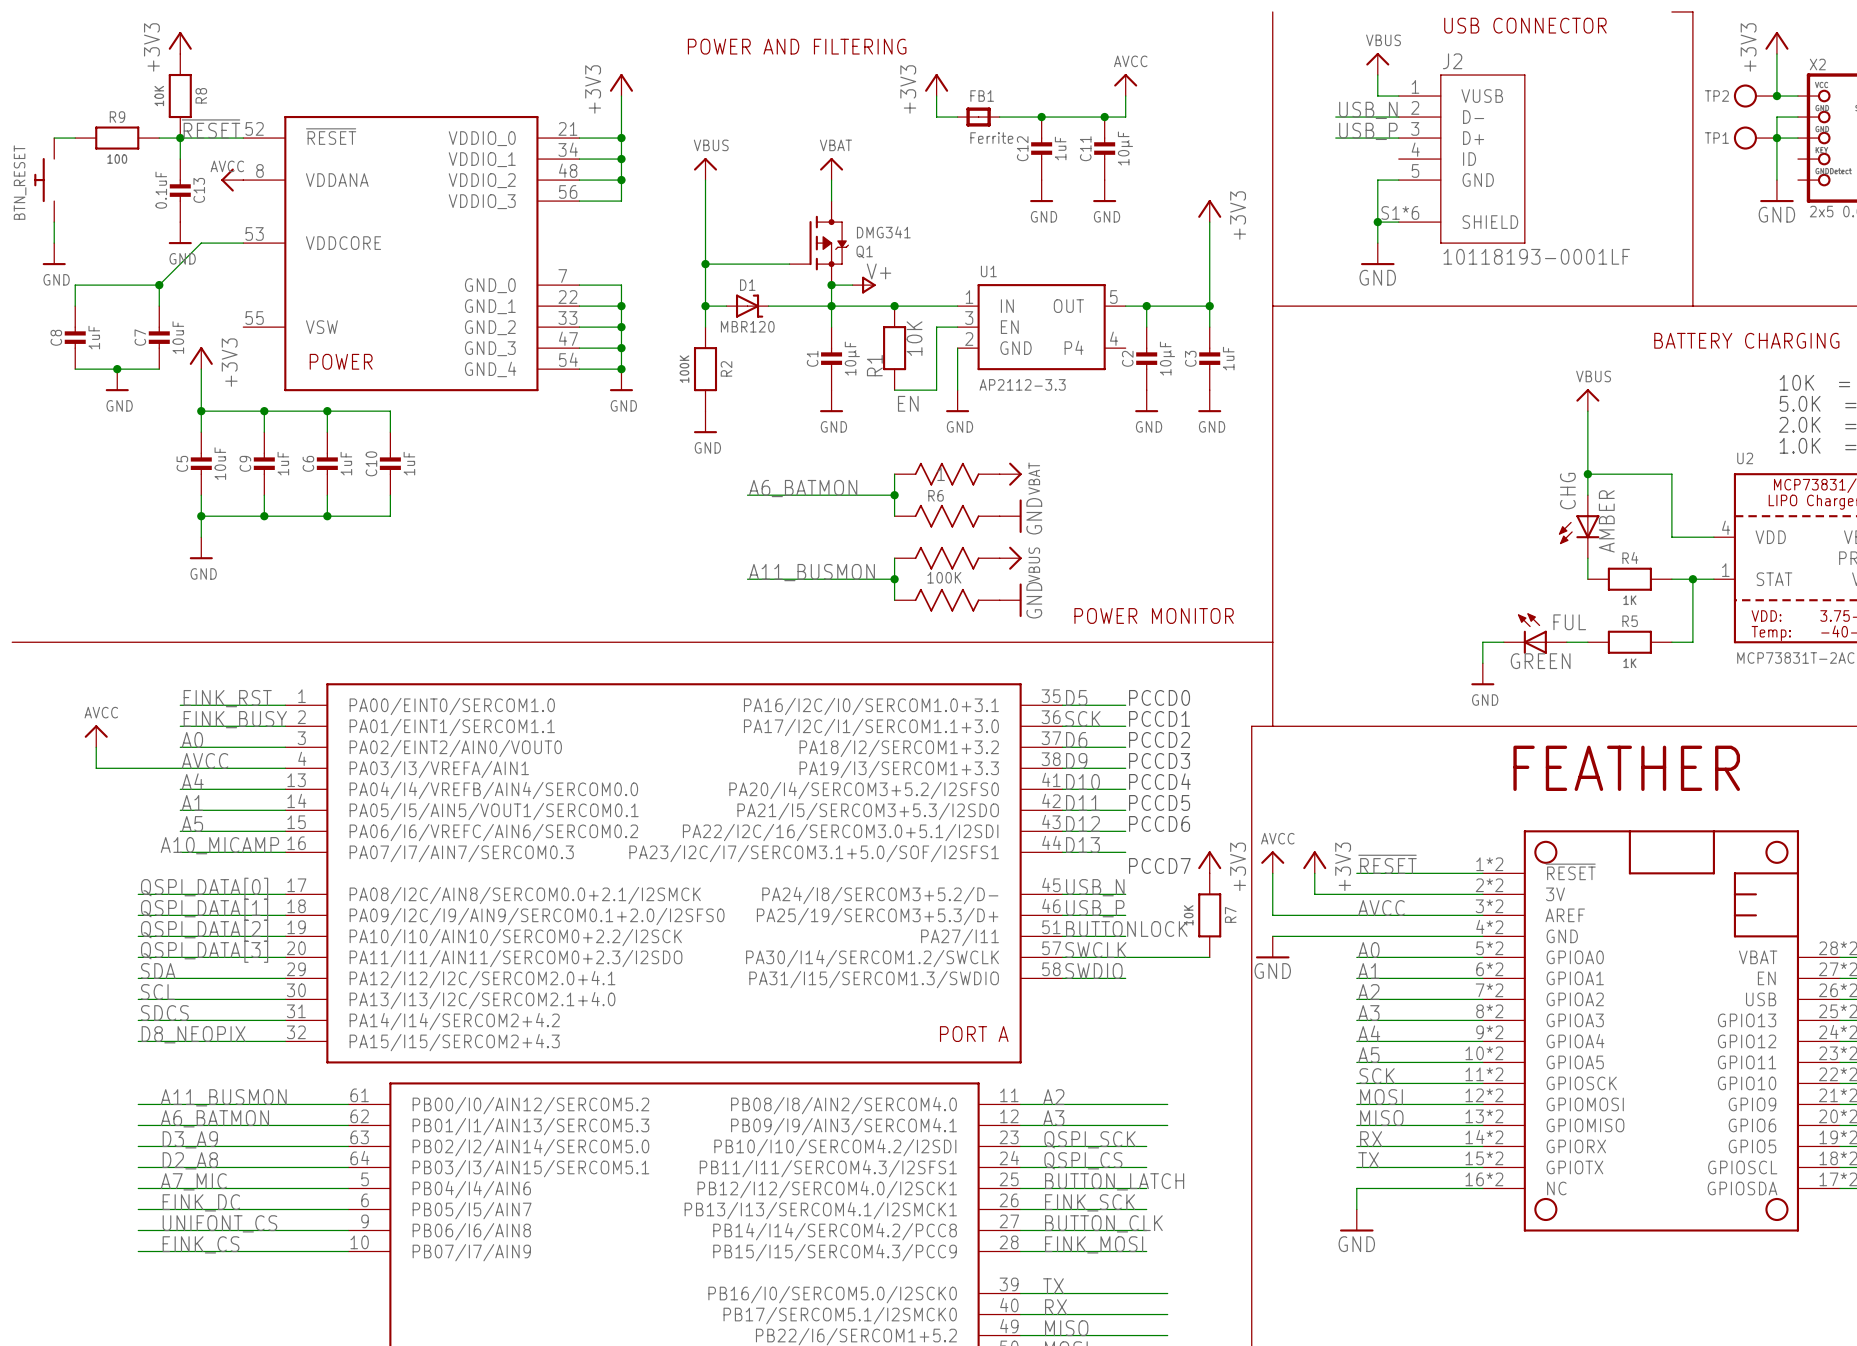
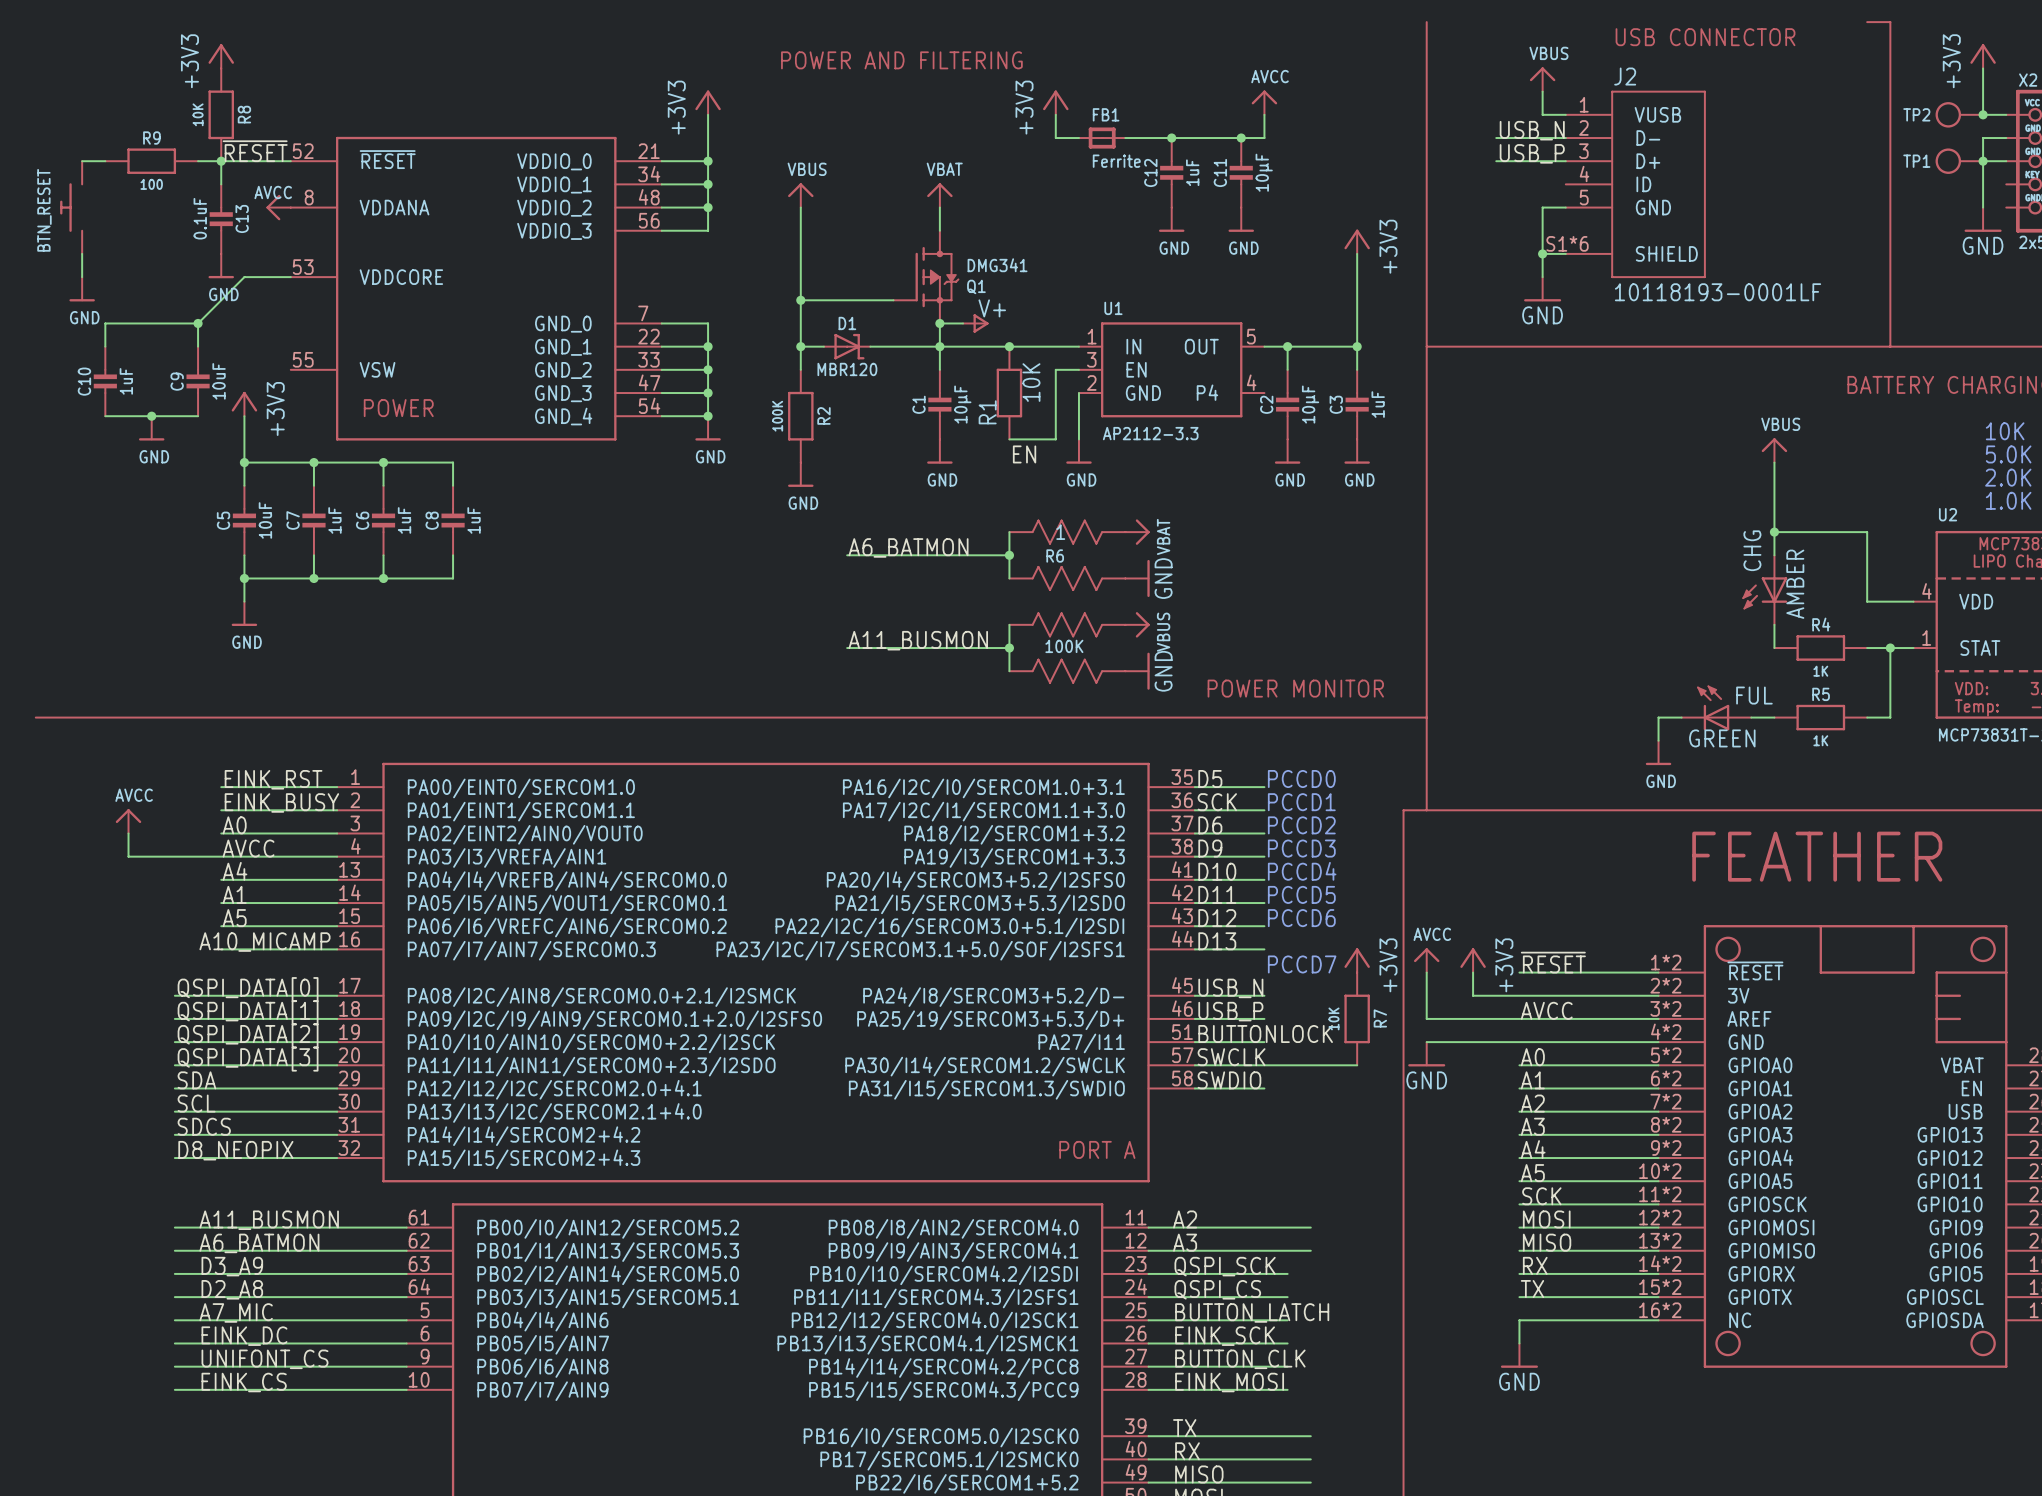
C8 name: C8 (56, 337) -> C10 (84, 381)
C7 name: C7 (140, 337) -> C9 (177, 381)
C9 name: C9 (245, 463) -> C7 (293, 520)
C10 name: C10 (371, 463) -> C8 (432, 520)

